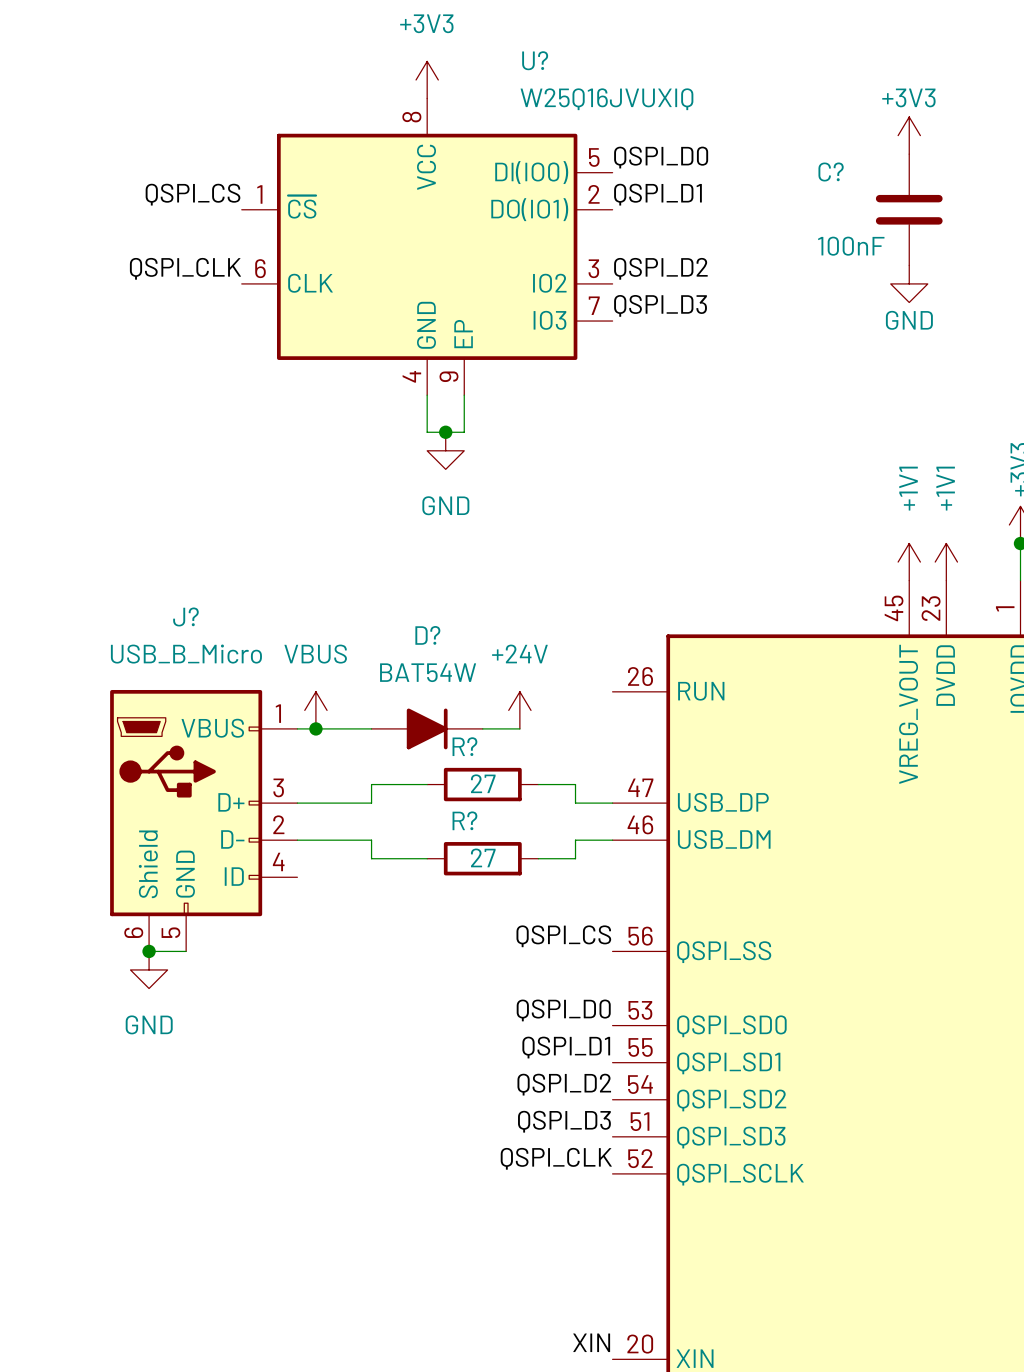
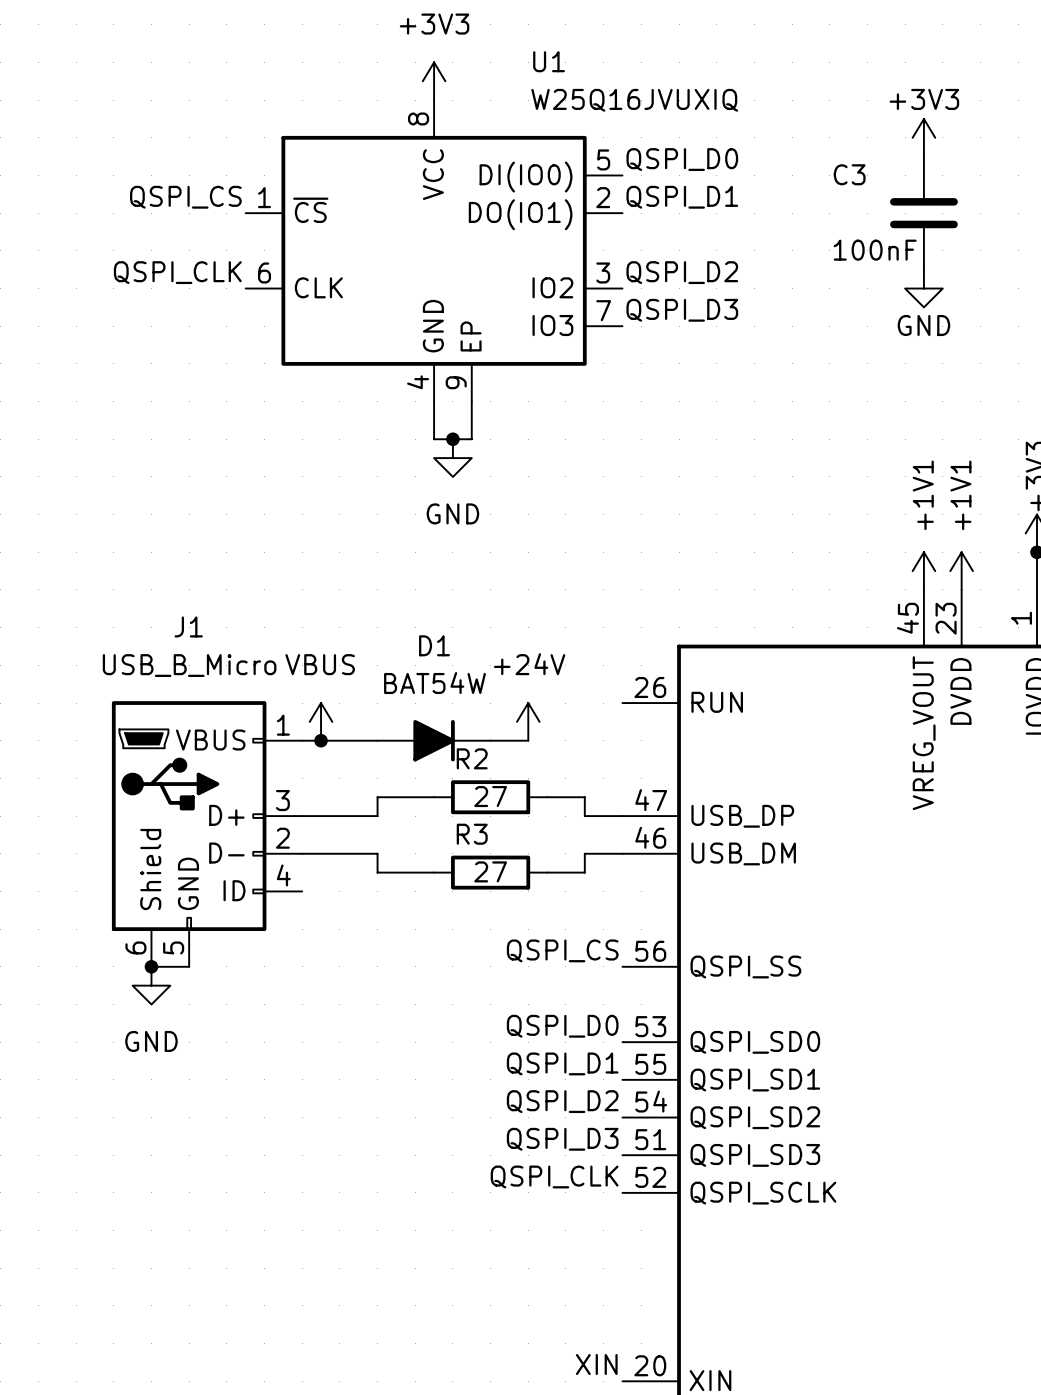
U? name: U? (535, 60) -> U1 (549, 61)
C? name: C? (831, 172) -> C3 (849, 174)
J? name: J? (185, 616) -> J1 (188, 626)
D? name: D? (427, 635) -> D1 (434, 645)
R? name: R? (464, 746) -> R2 (472, 758)
R? name: R? (464, 820) -> R3 (472, 834)

